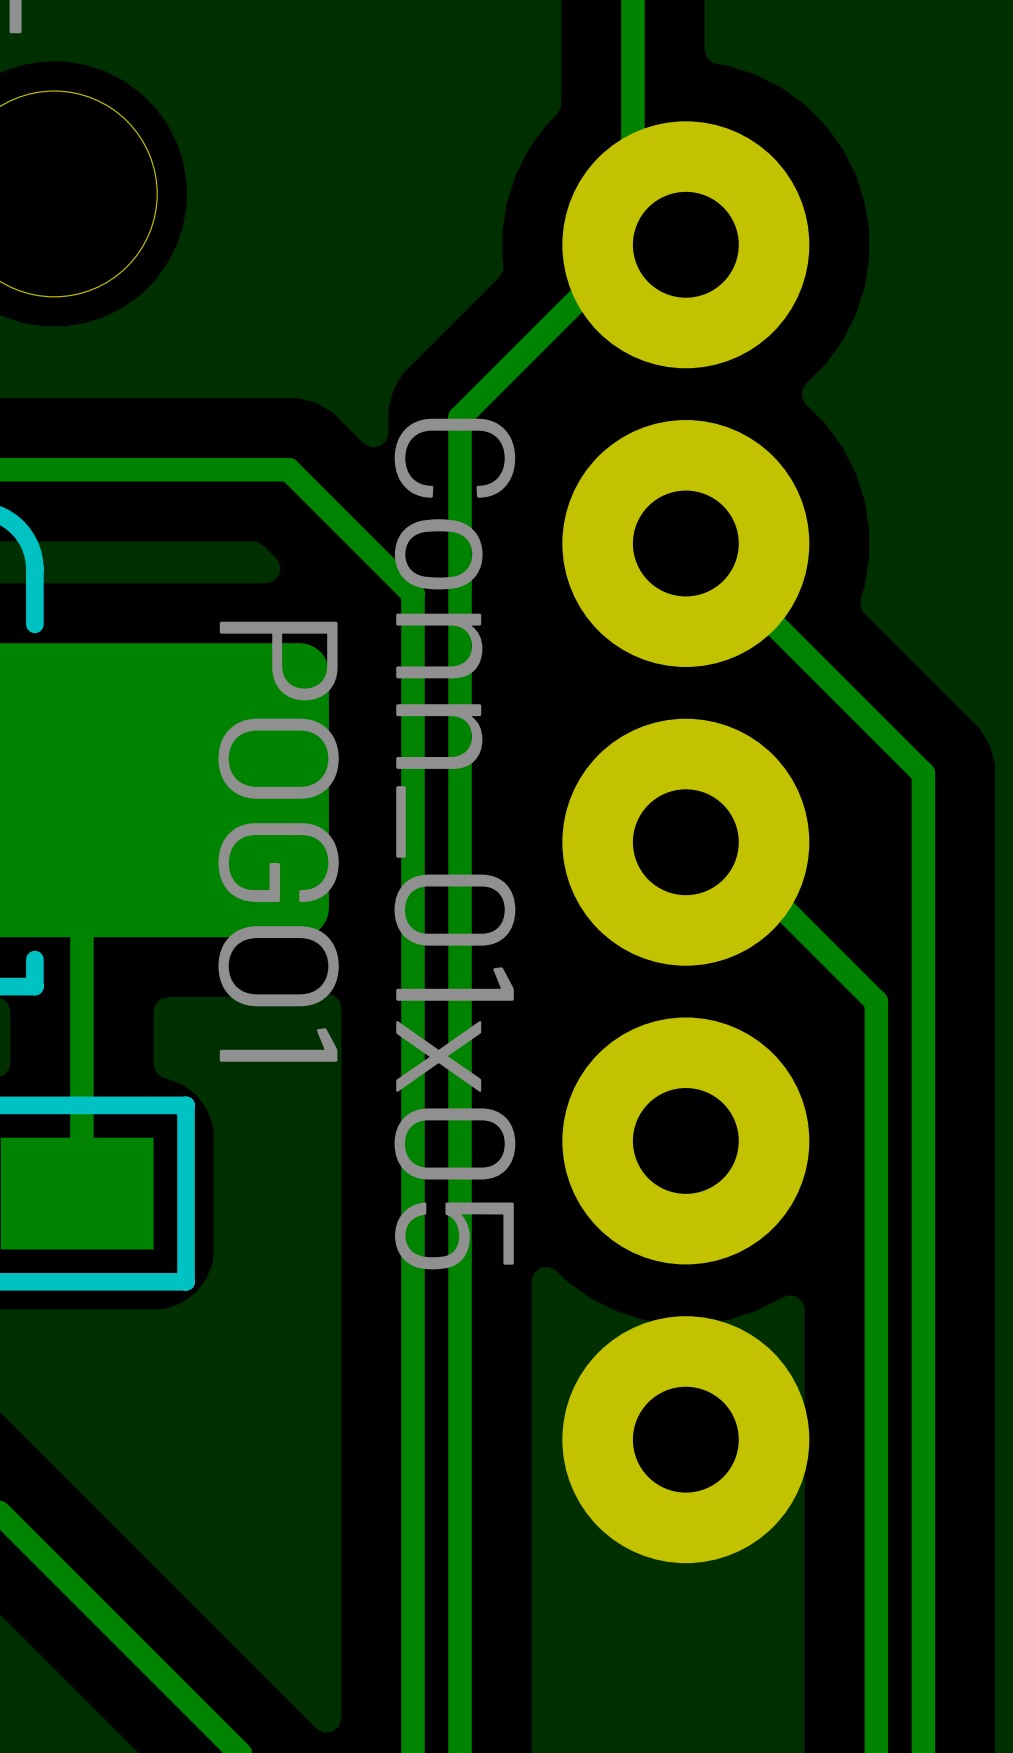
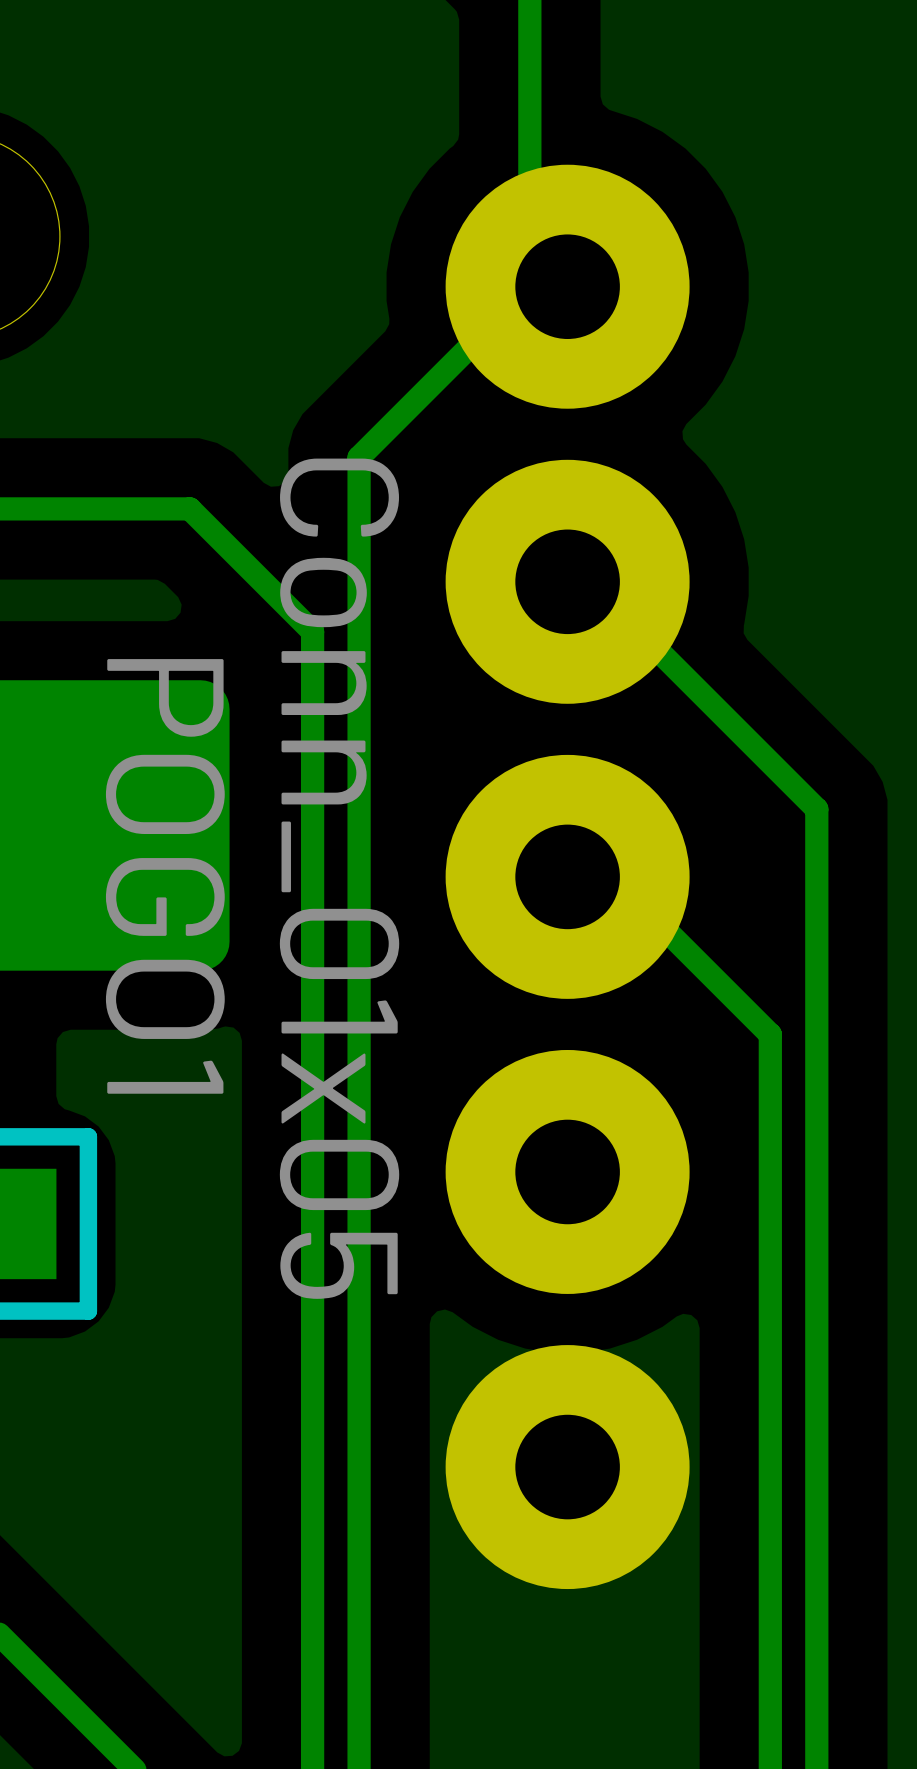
POGO1 position: (685, 842) -> (567, 876)

